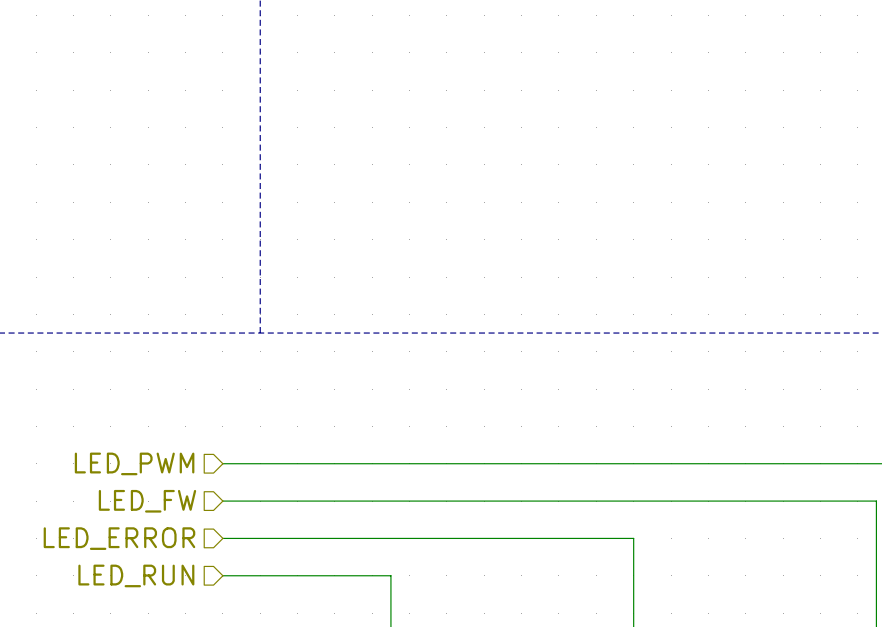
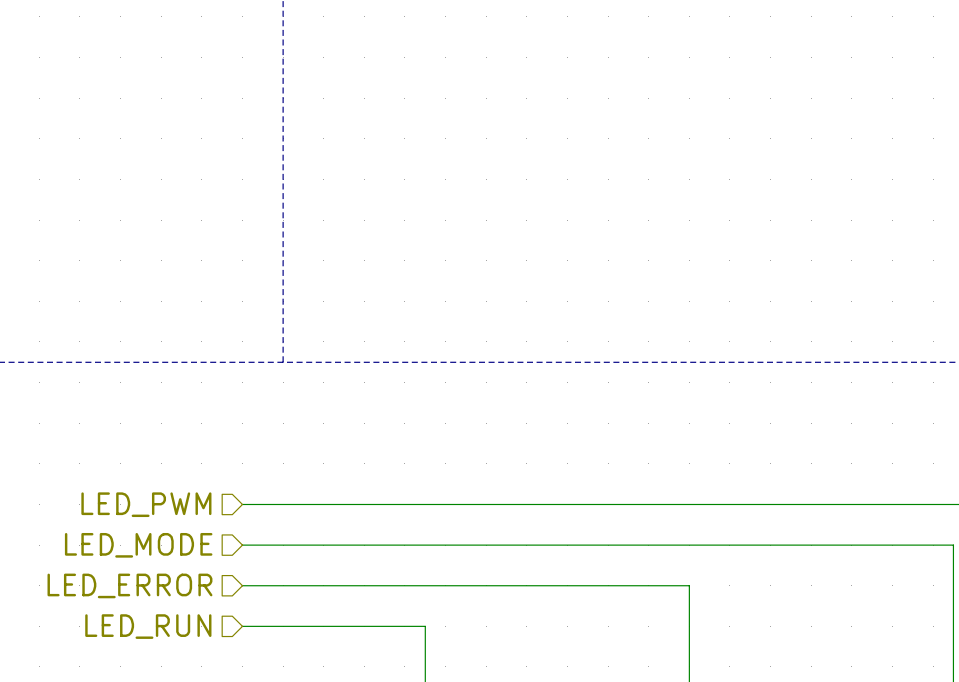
hierarchical label: LED_FW (147, 501) -> LED_MODE (138, 545)

